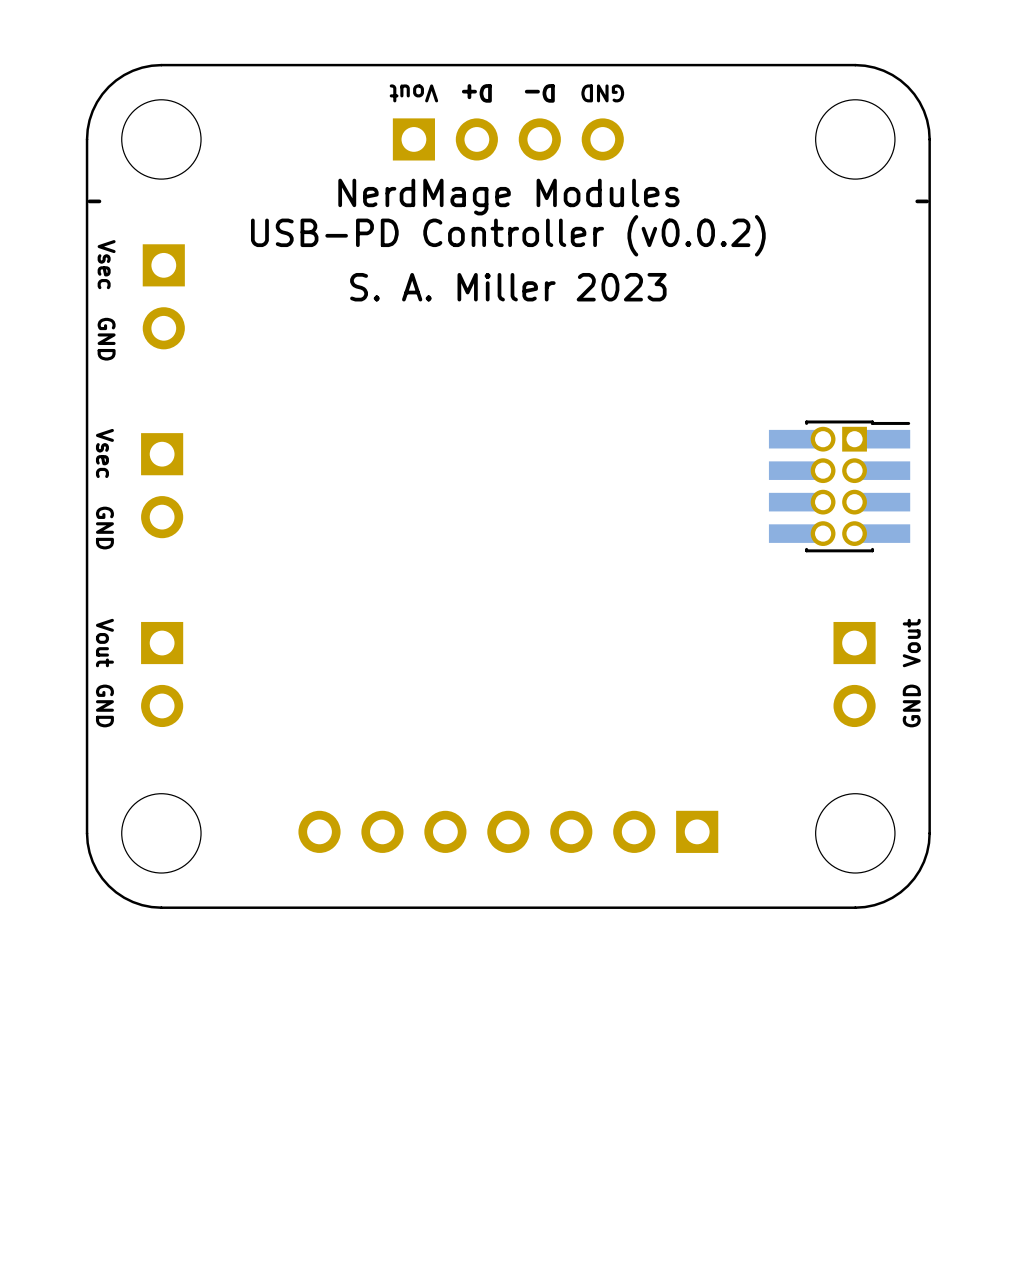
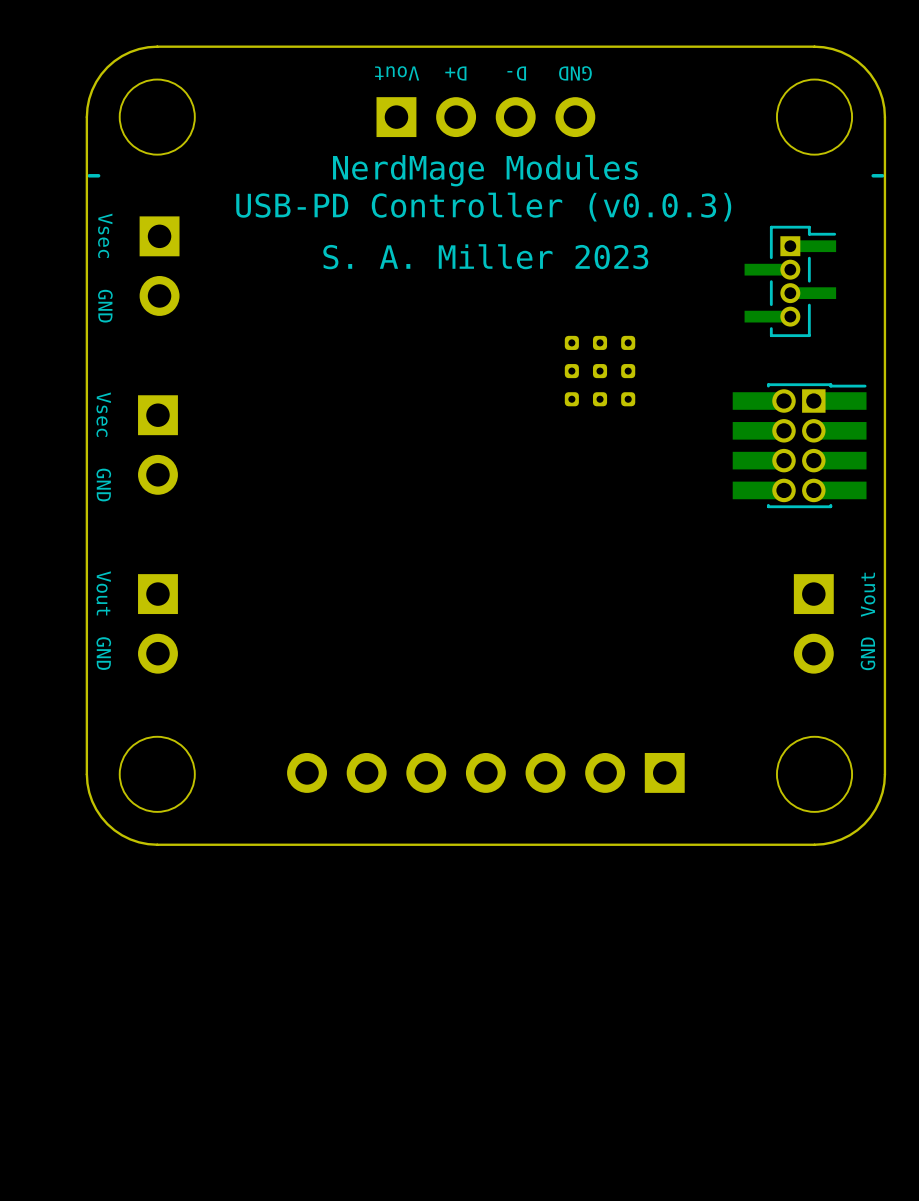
text: USB-PD Controller (v0.0.2) (508, 235) -> USB-PD Controller (v0.0.3) (483, 207)
part: none -> (790, 281)
part: none -> (600, 371)

